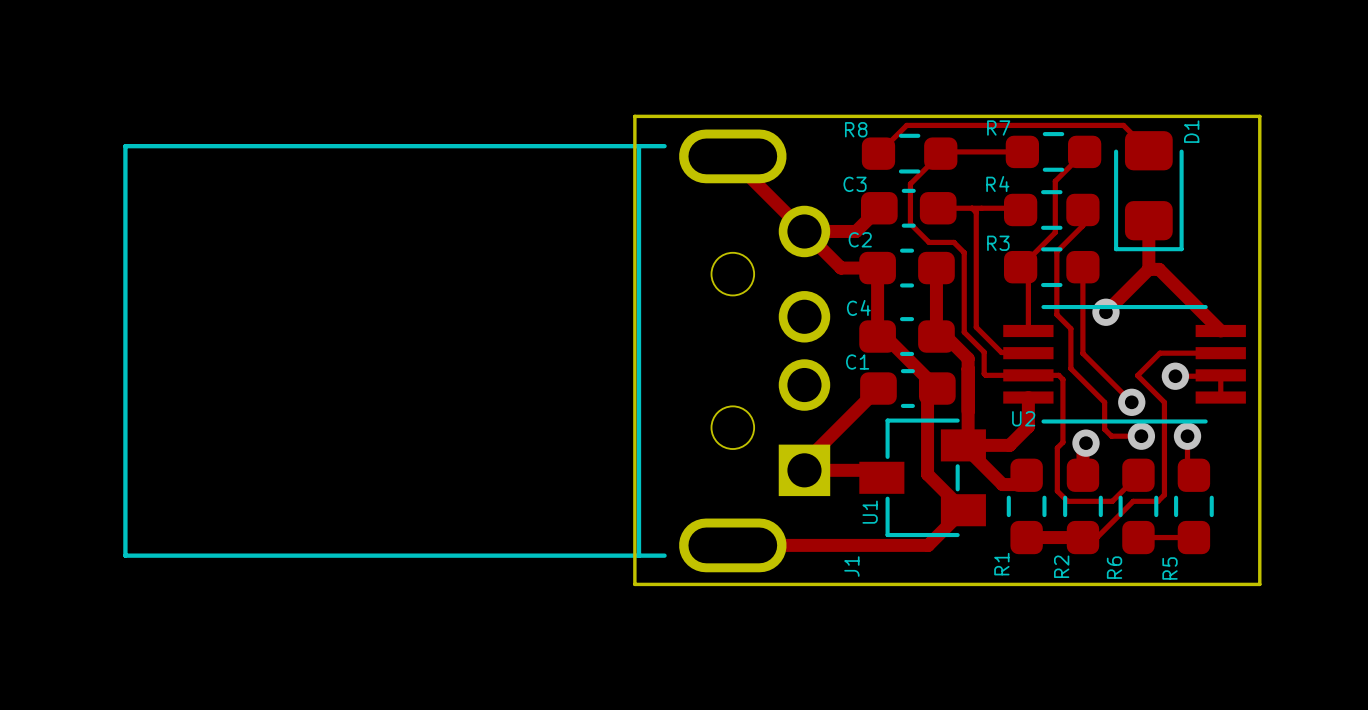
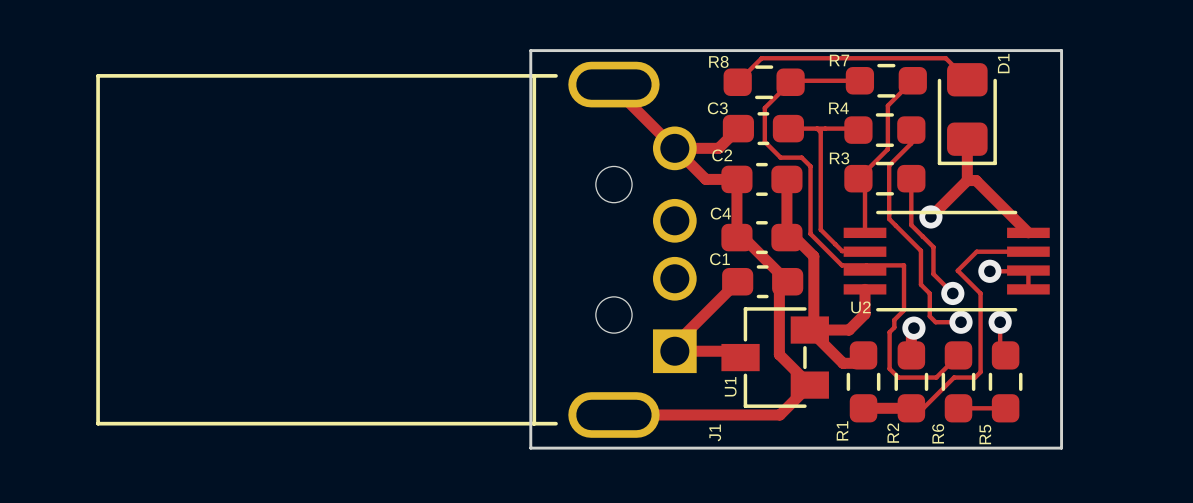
track: (1082, 321) (1082, 353) (1108, 379) -> (911, 225) (933, 247) (933, 274)
track: (1070, 328) (1070, 368) (1094, 391) -> (901, 230) (920, 250) (920, 284)
track: (984, 352) (985, 375) (1058, 375) (1062, 379) (1062, 442) -> (827, 250) (841, 265) (904, 265) (904, 310) (894, 320) (894, 327)

